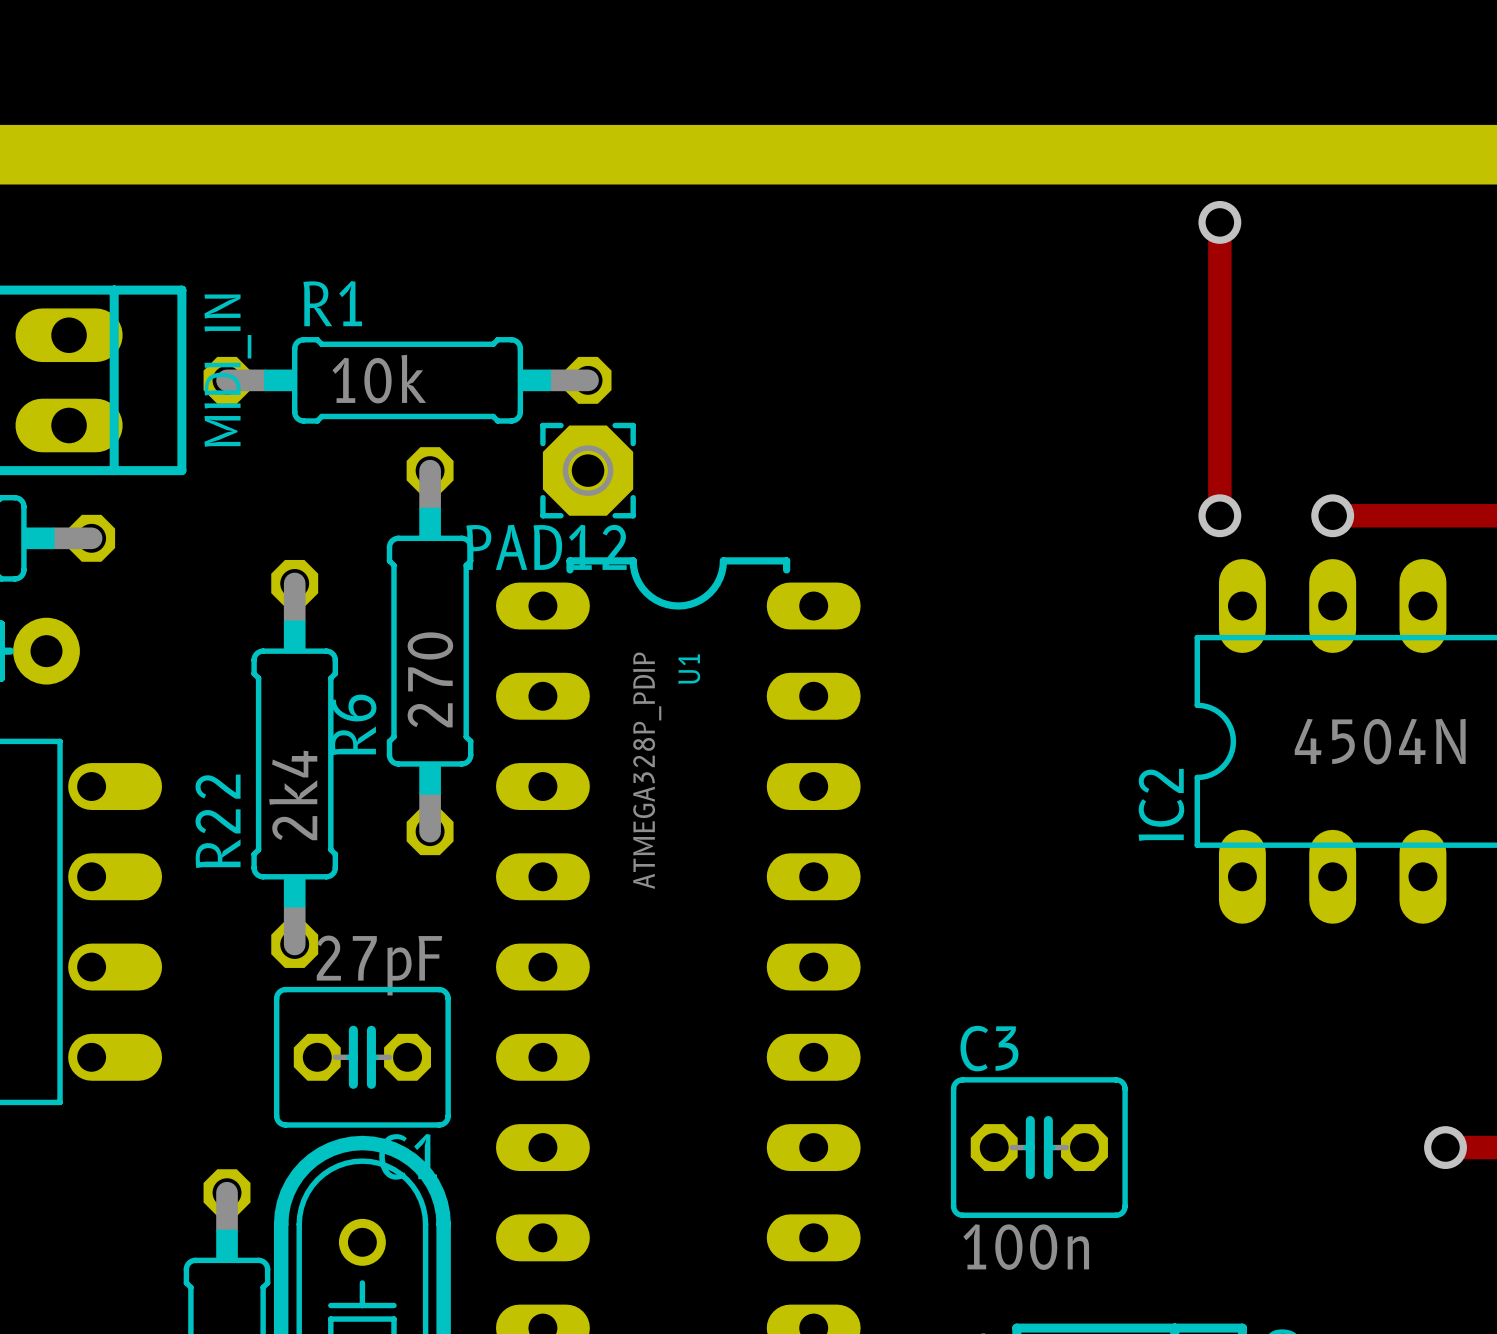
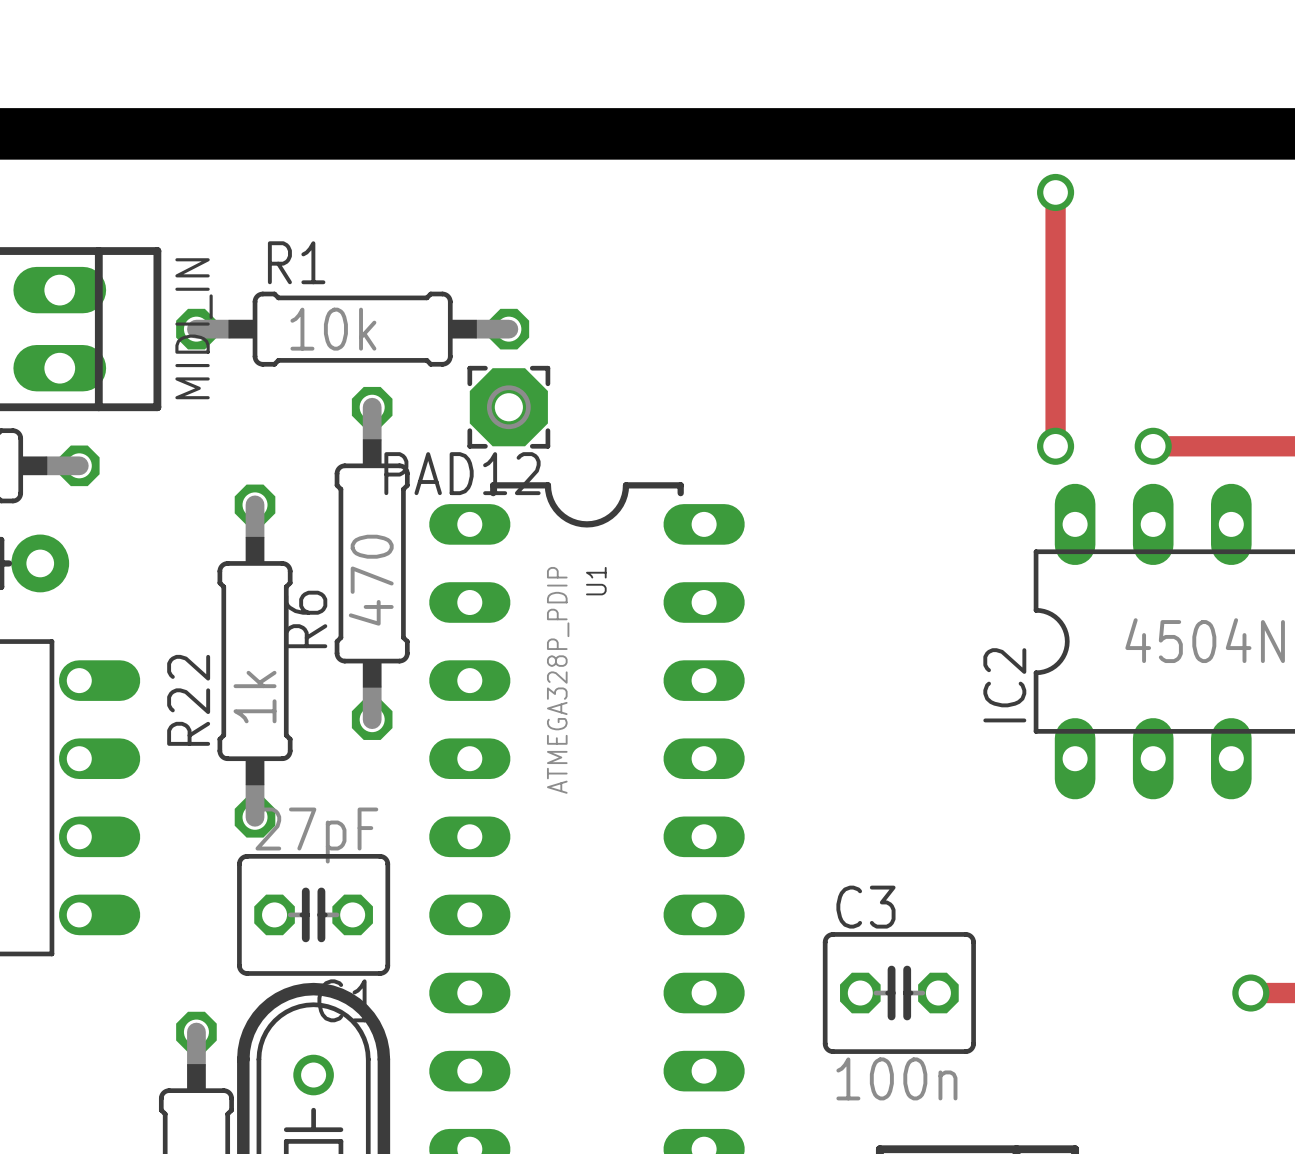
R6 value: 270 (430, 679) -> 470 (371, 580)
R22 value: 2k4 (293, 795) -> 1k (255, 697)

